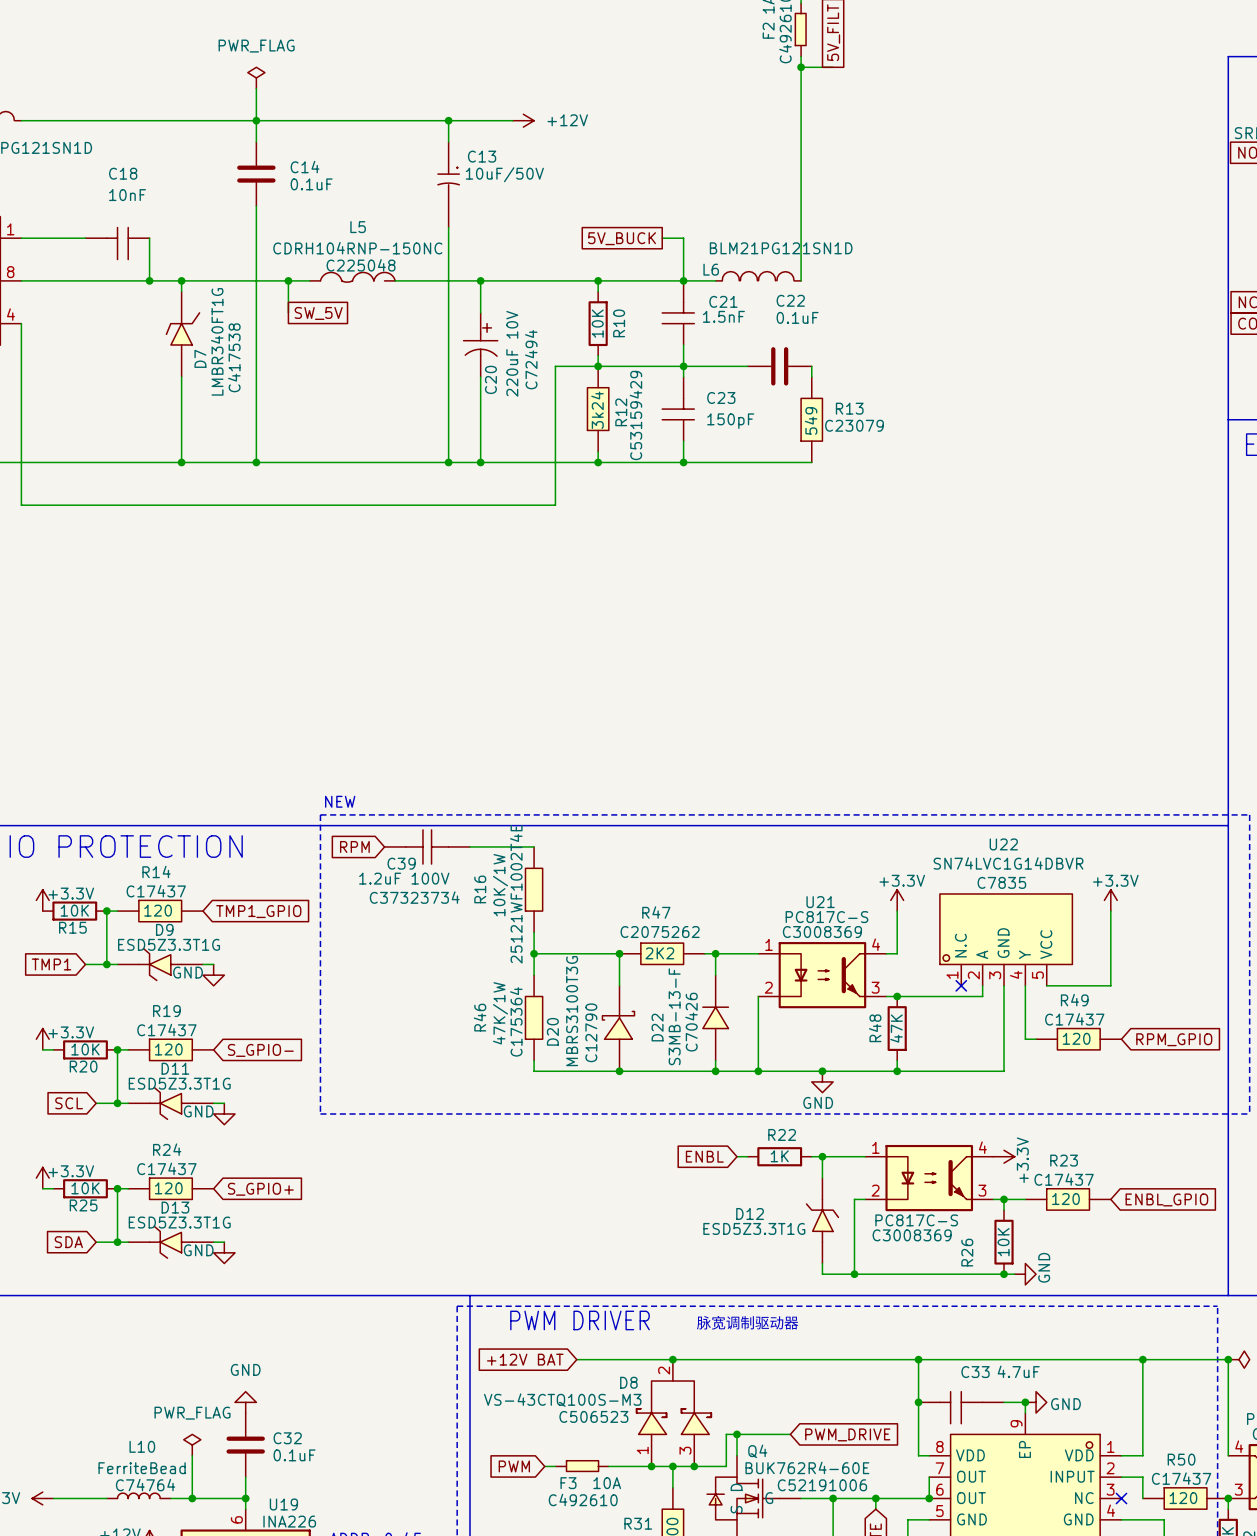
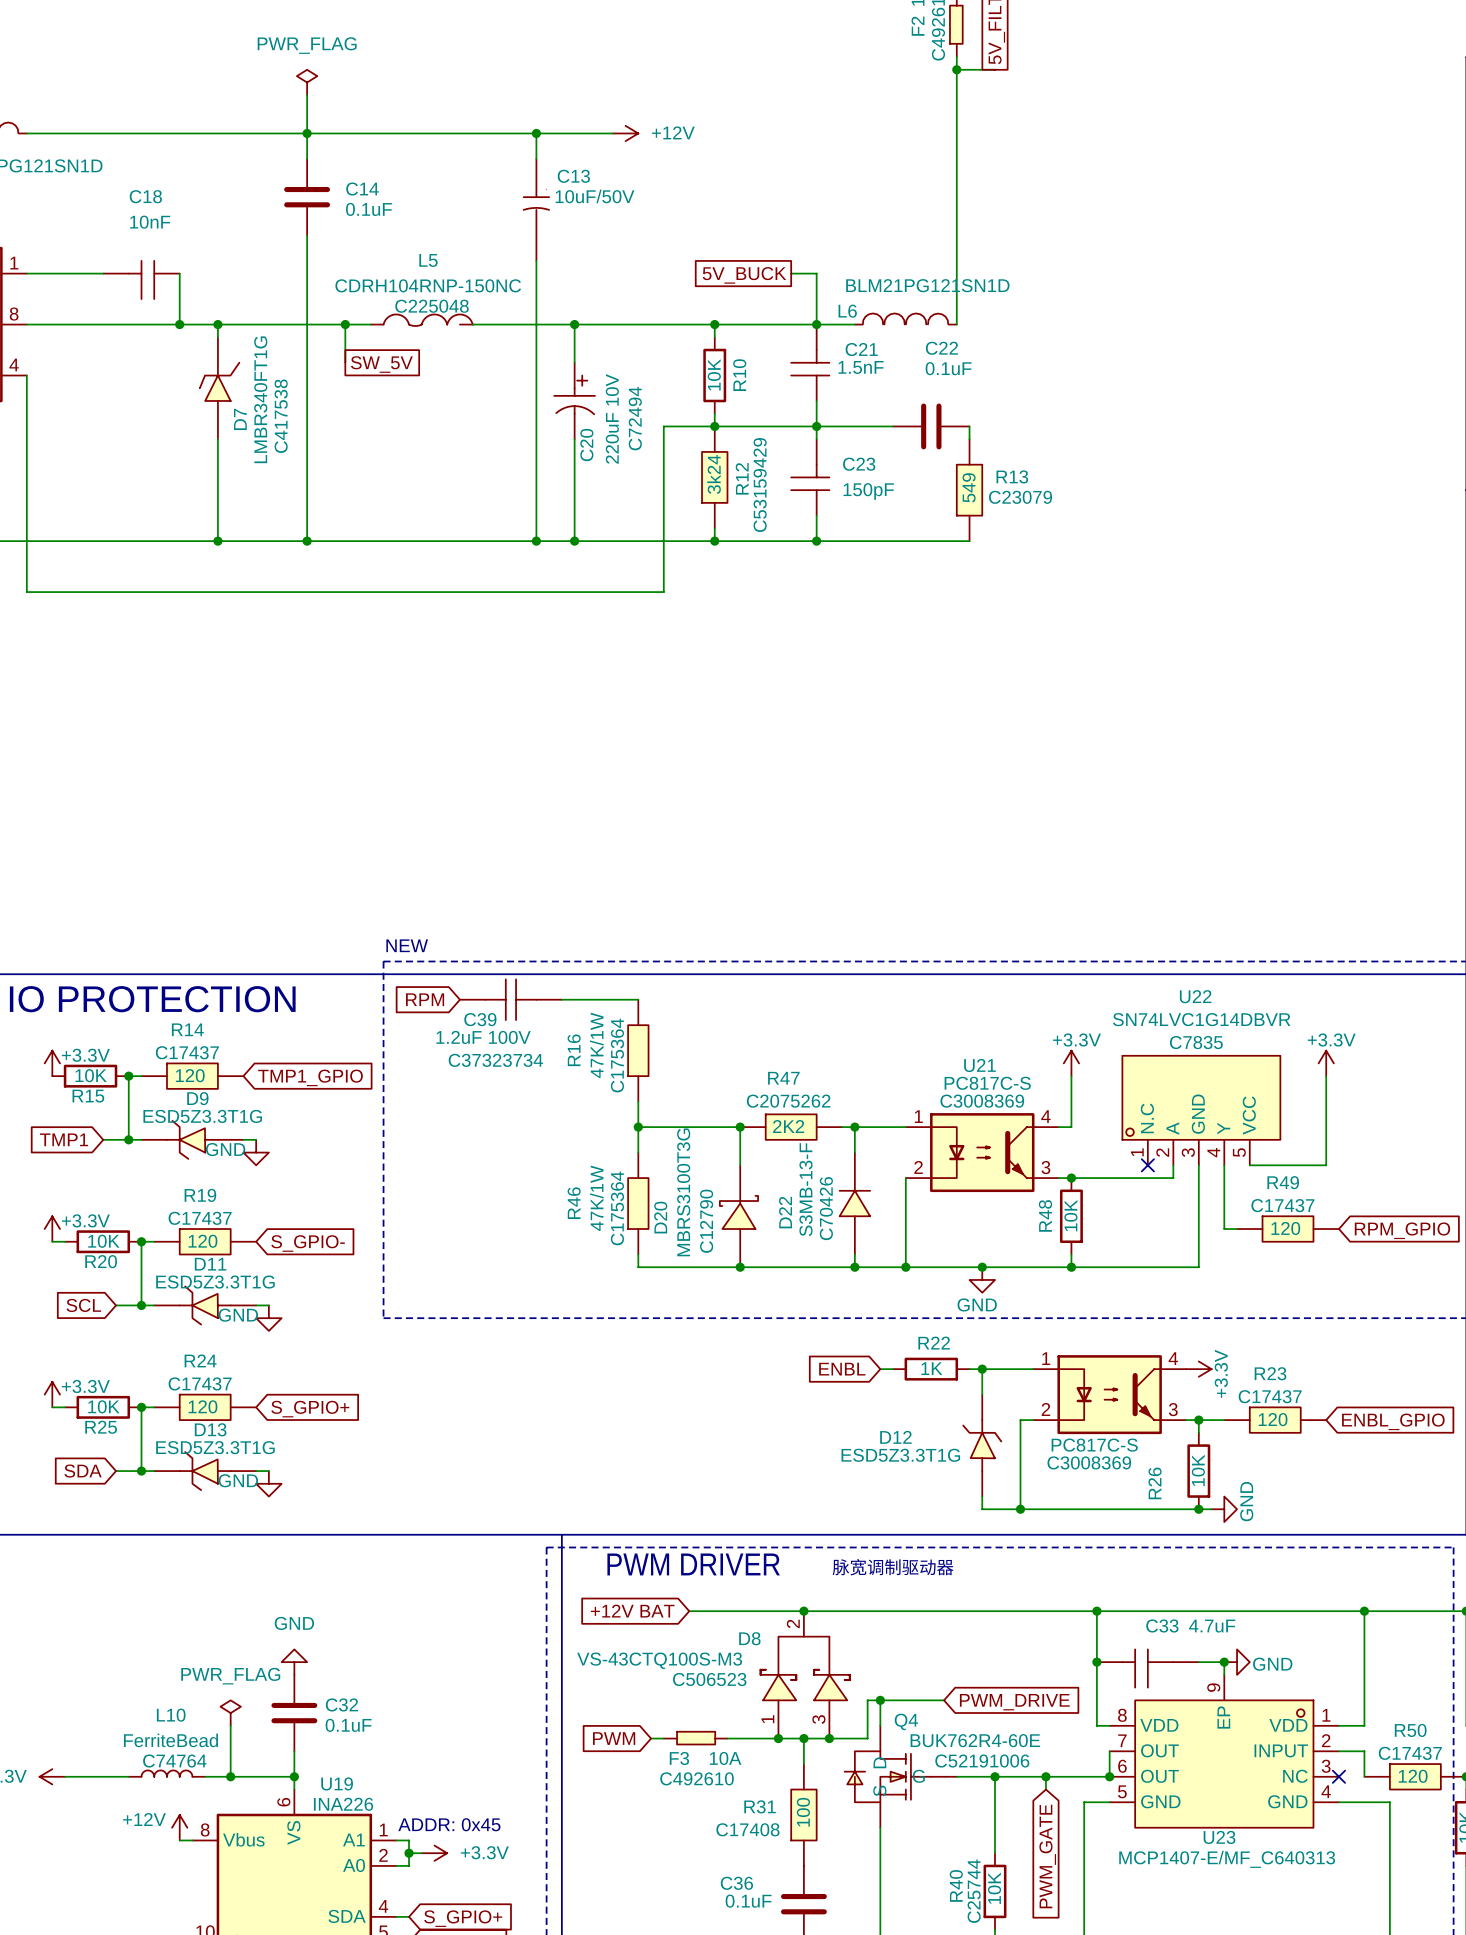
R16 value: 10K/1W (500, 885) -> 47K/1W (596, 1045)
R16 text: 25121WF1002T4E (516, 894) -> C175364 (617, 1055)
R48 value: 47K (896, 1028) -> 10K (1070, 1215)

